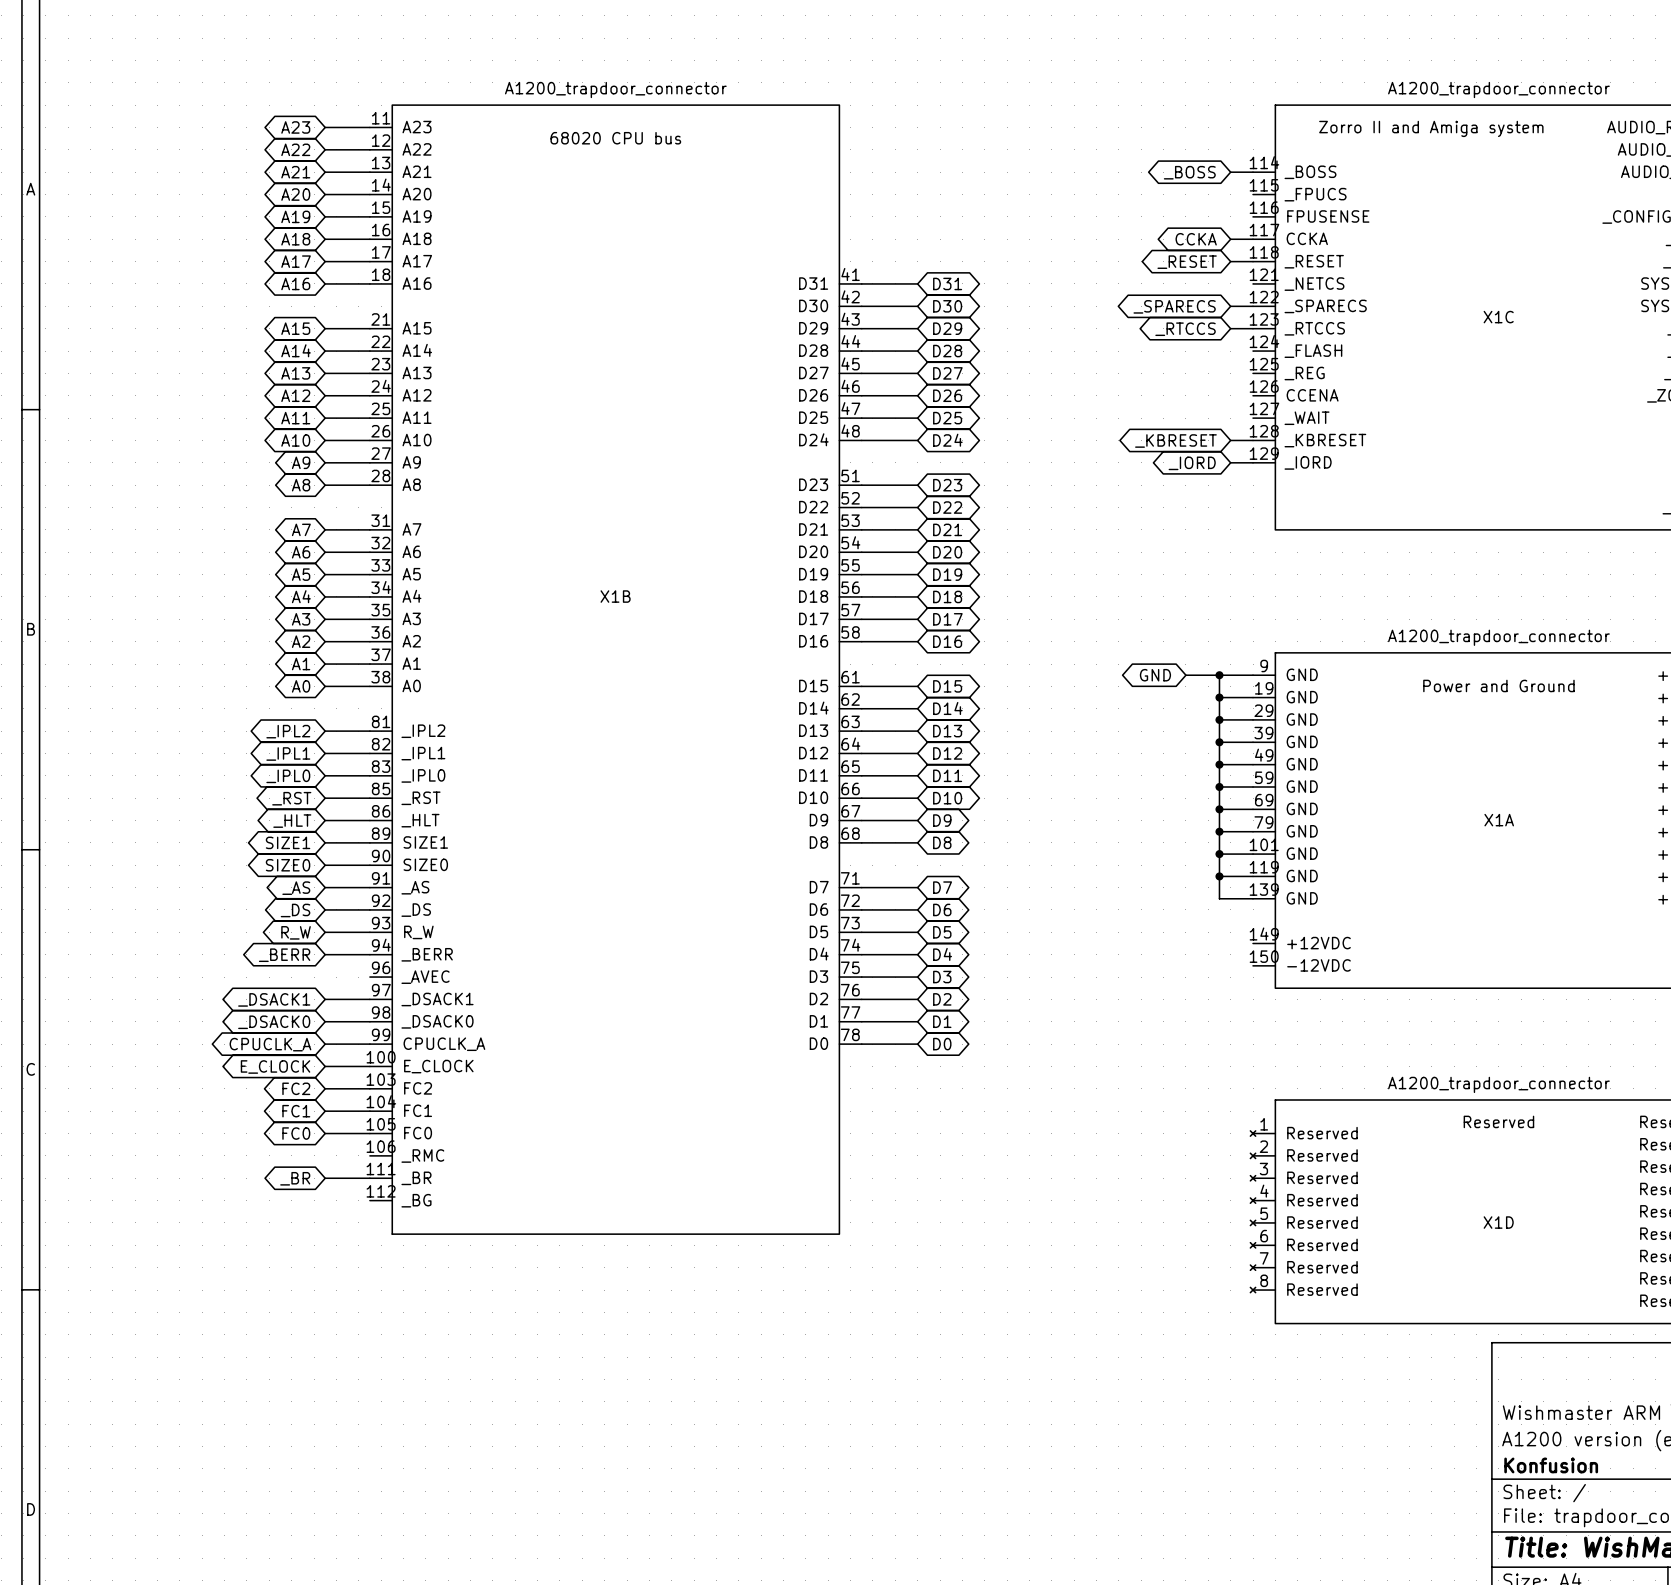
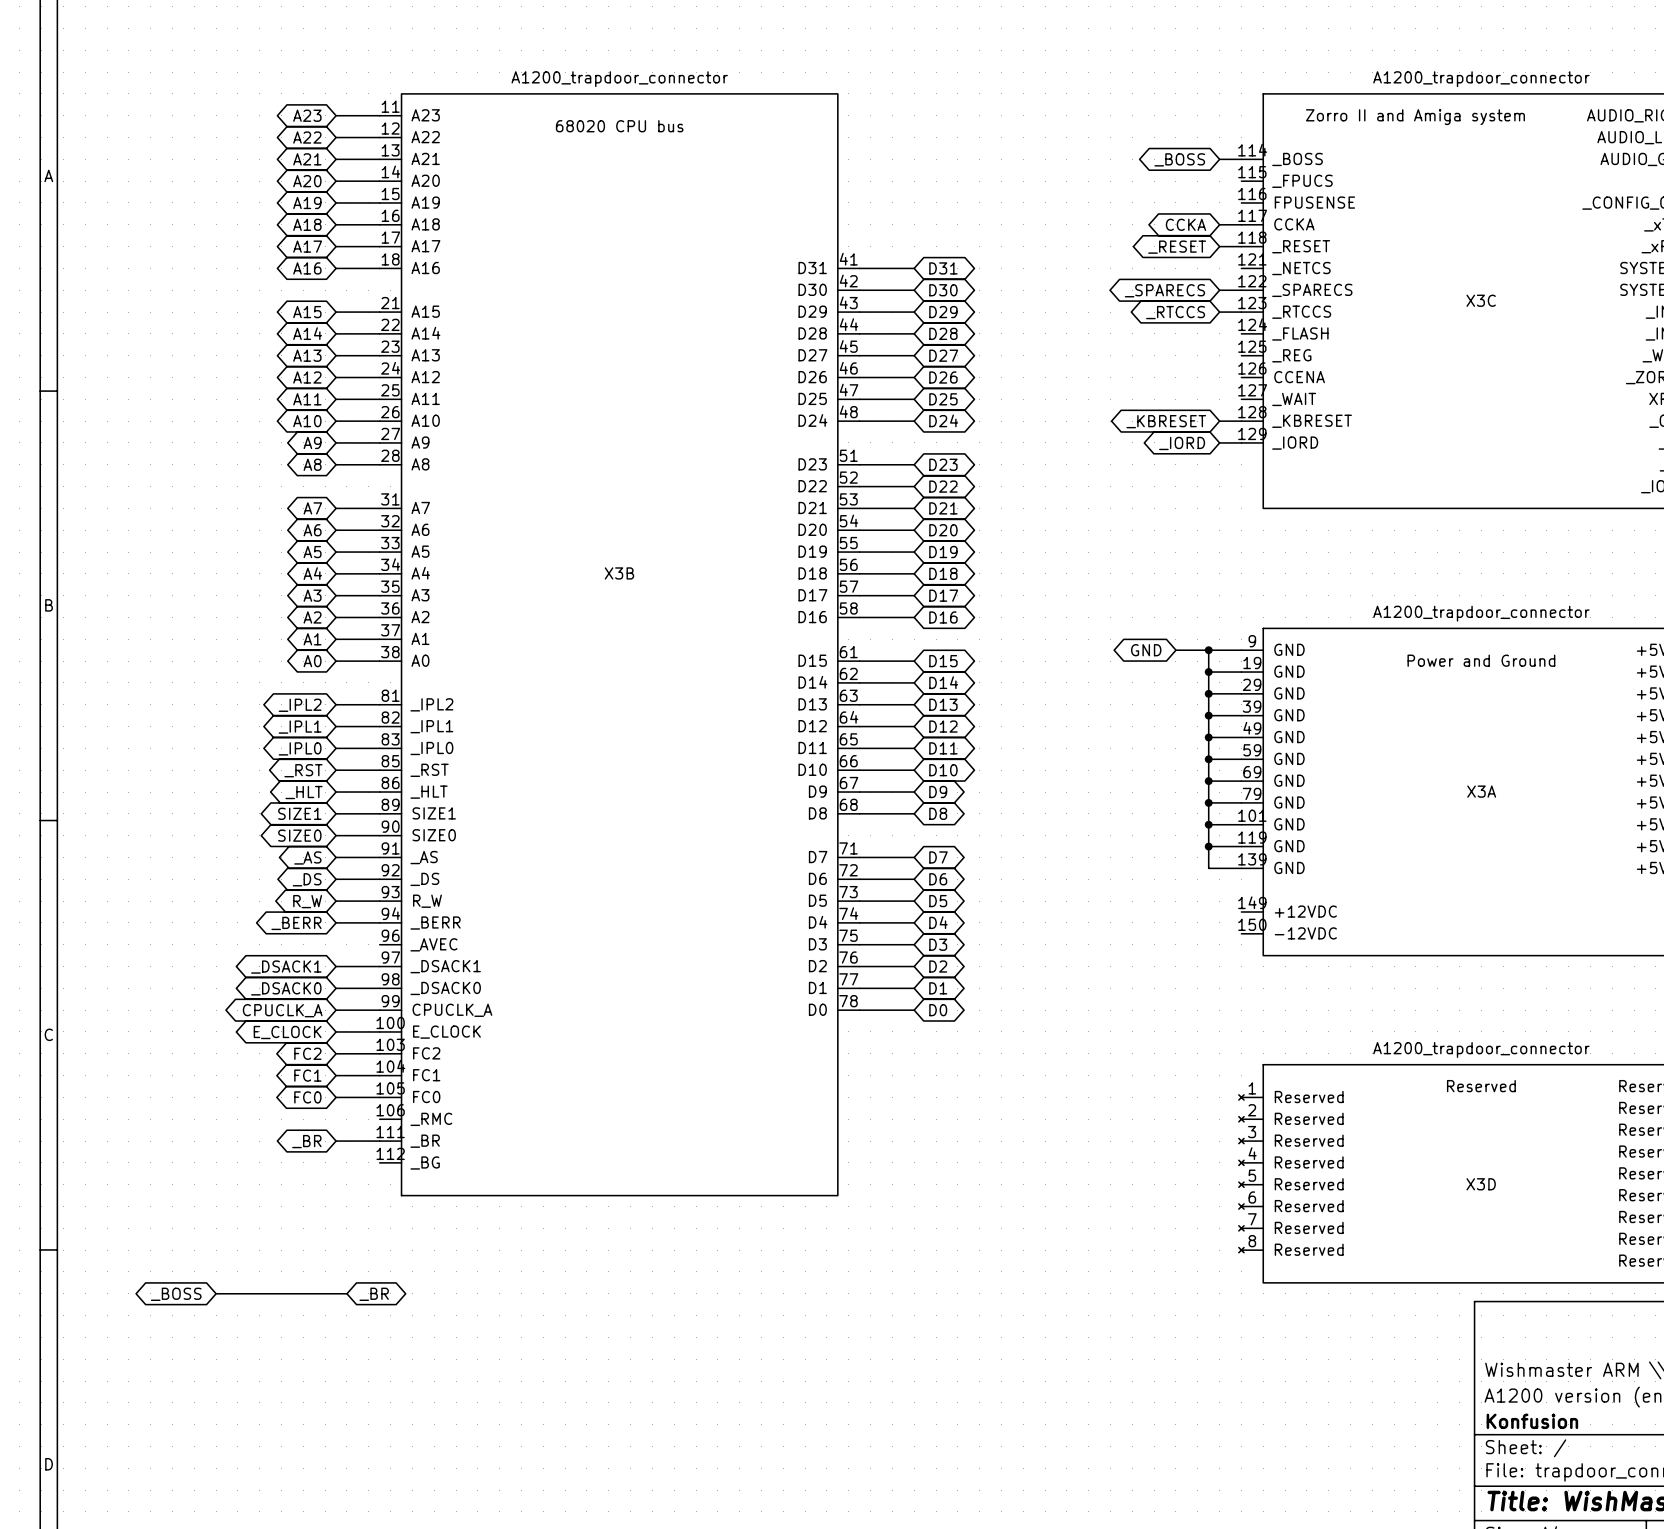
X1C name: X1C (1498, 317) -> X3C (1481, 300)
X1B name: X1B (615, 596) -> X3B (619, 573)
X1A name: X1A (1499, 820) -> X3A (1481, 791)
X1D name: X1D (1498, 1222) -> X3D (1481, 1184)
wire: none -> (216, 1293) (346, 1293)
global label: none -> _BOSS (176, 1294)
global label: none -> _BR (374, 1294)

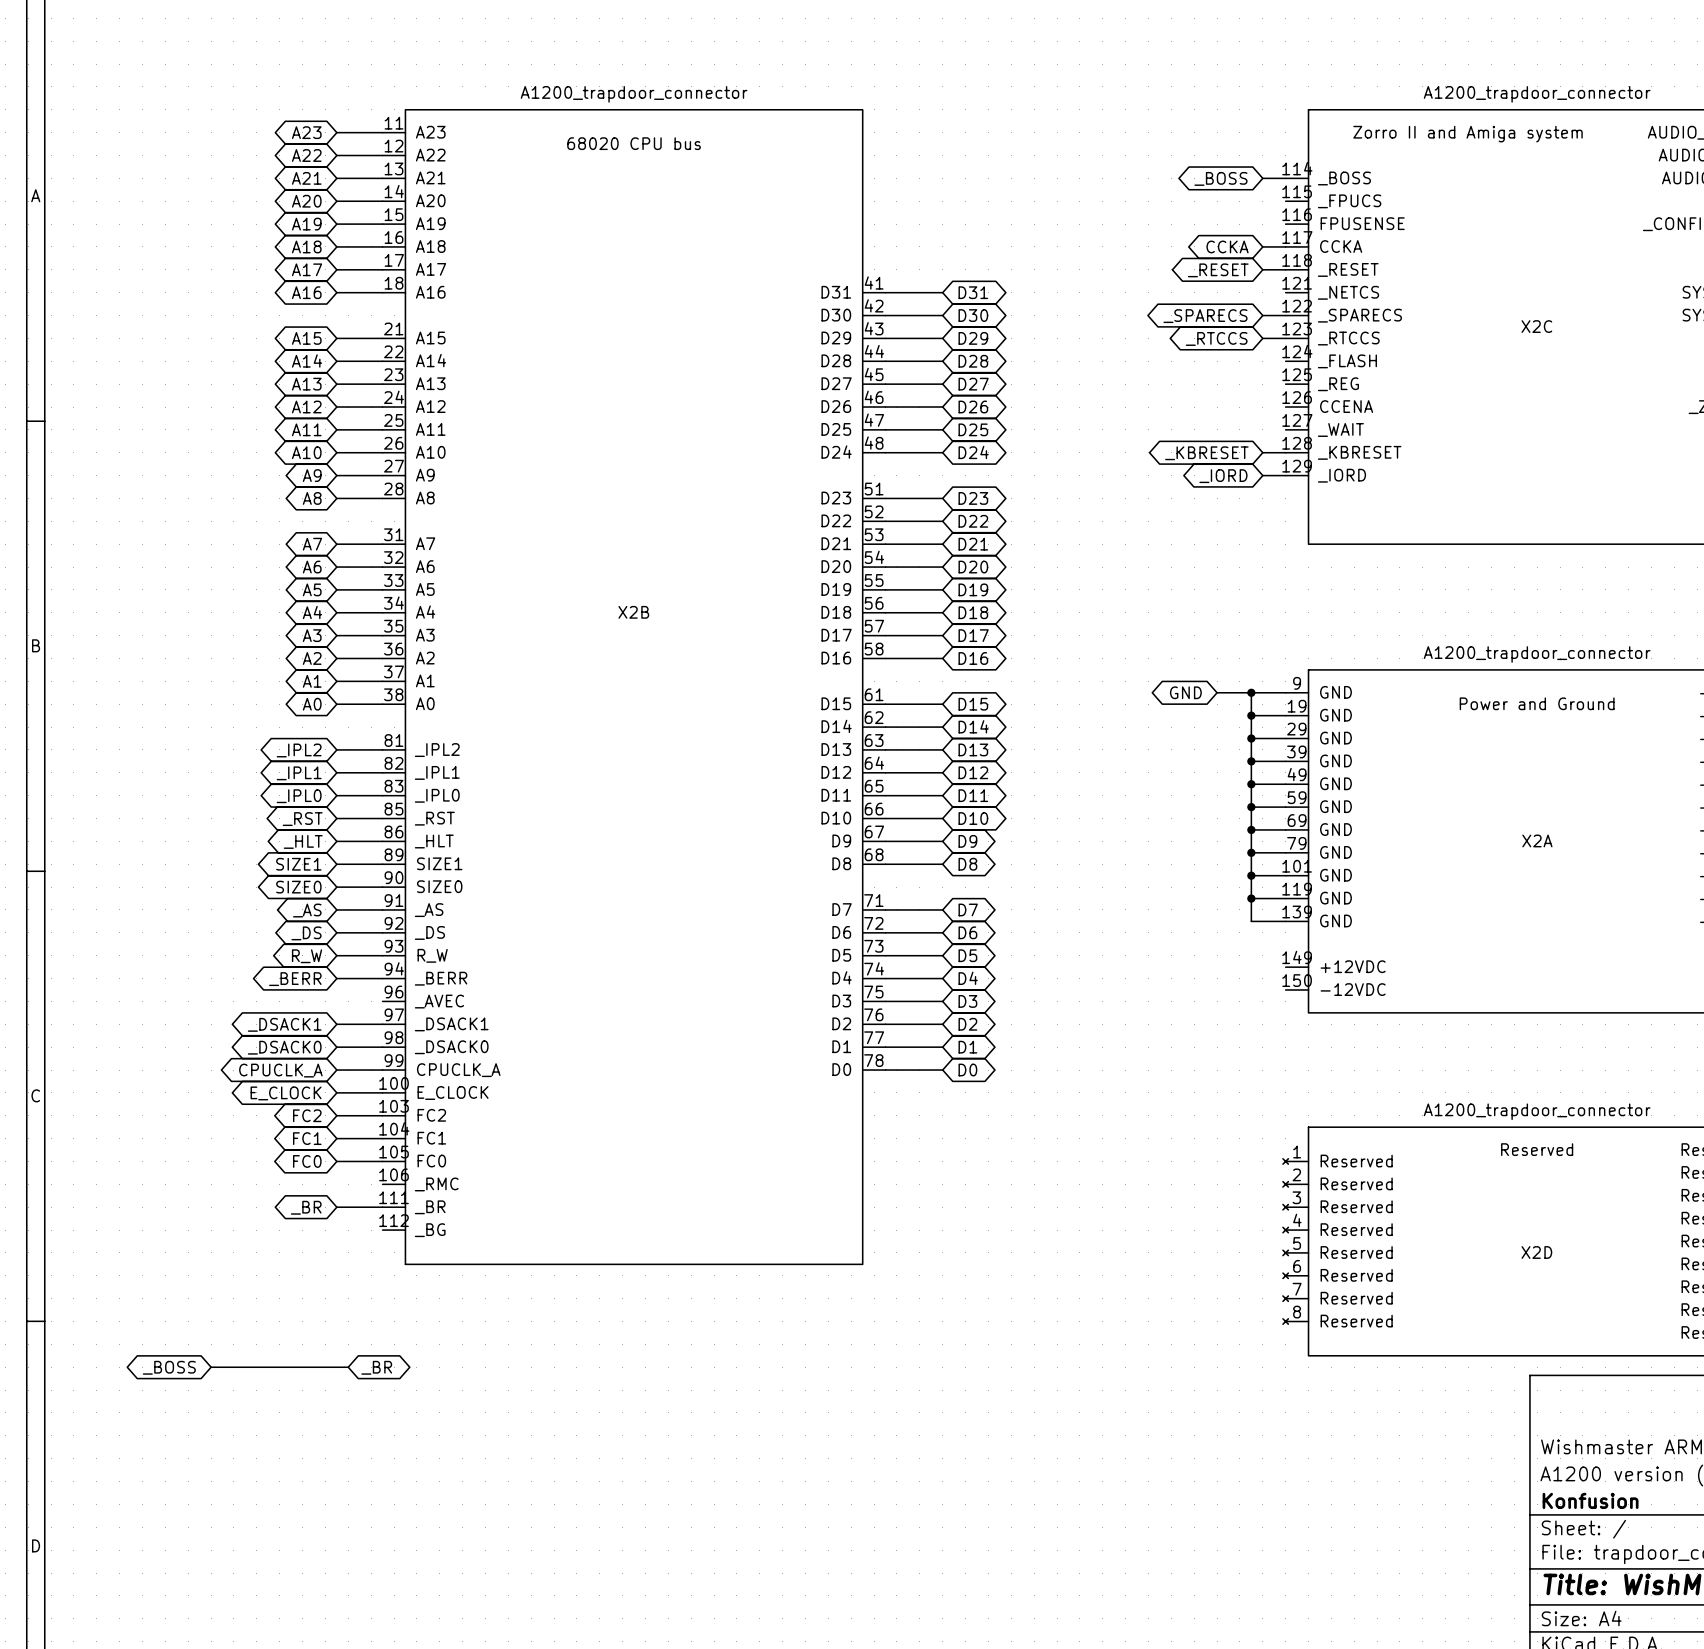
X3C name: X3C (1481, 300) -> X2C (1536, 326)
X3B name: X3B (619, 573) -> X2B (633, 612)
X3A name: X3A (1481, 791) -> X2A (1537, 840)
X3D name: X3D (1481, 1184) -> X2D (1536, 1252)

